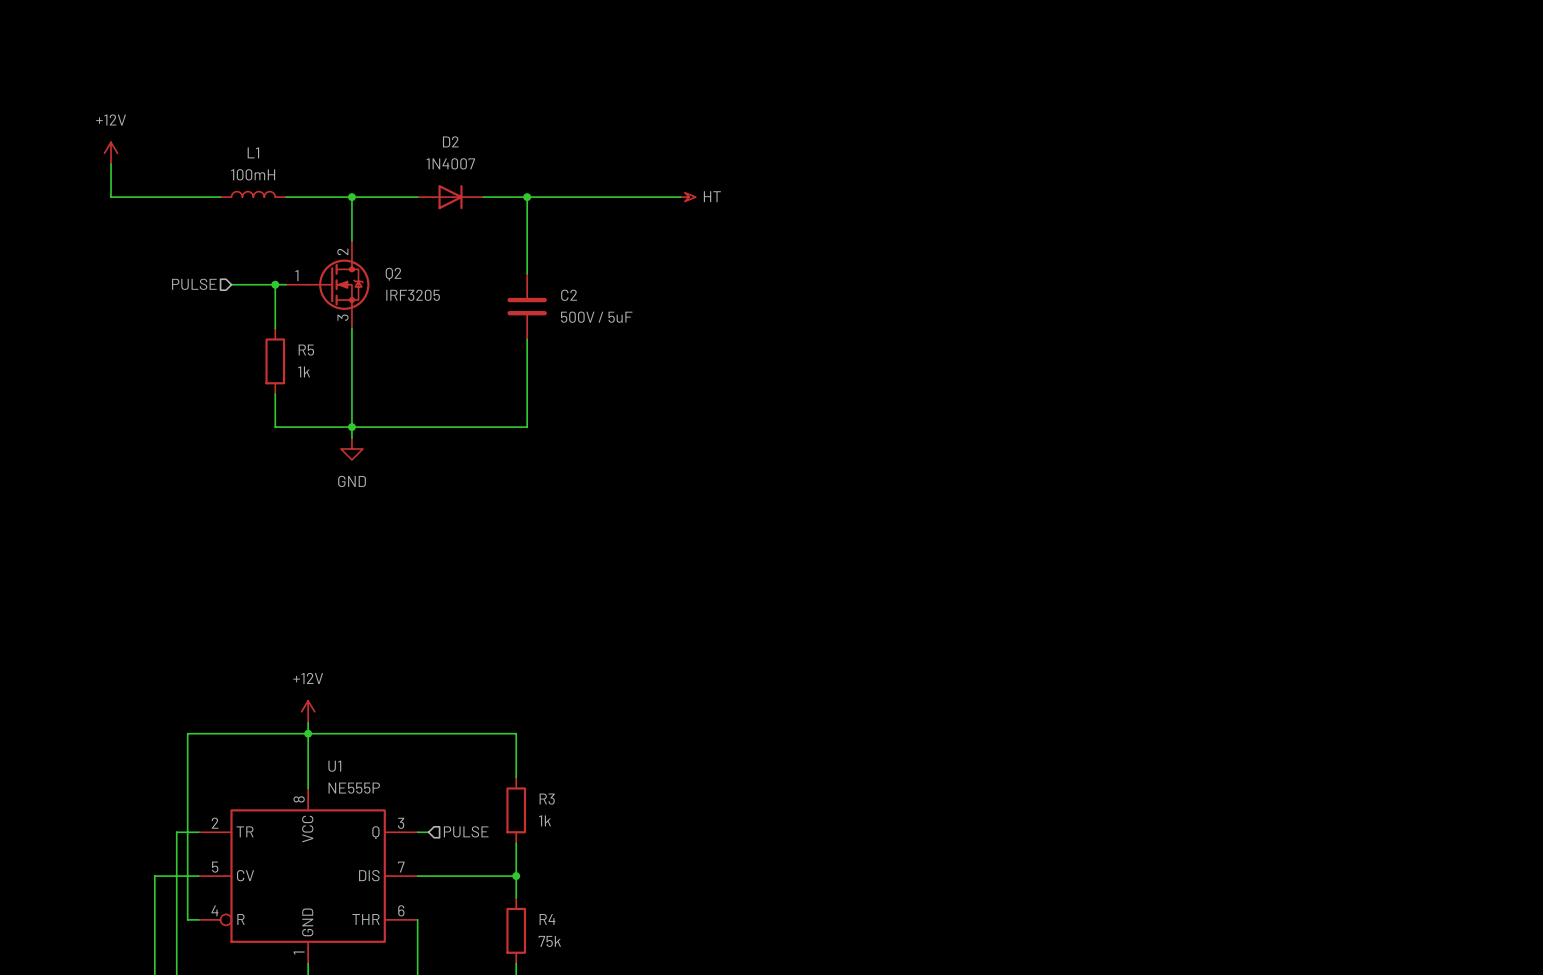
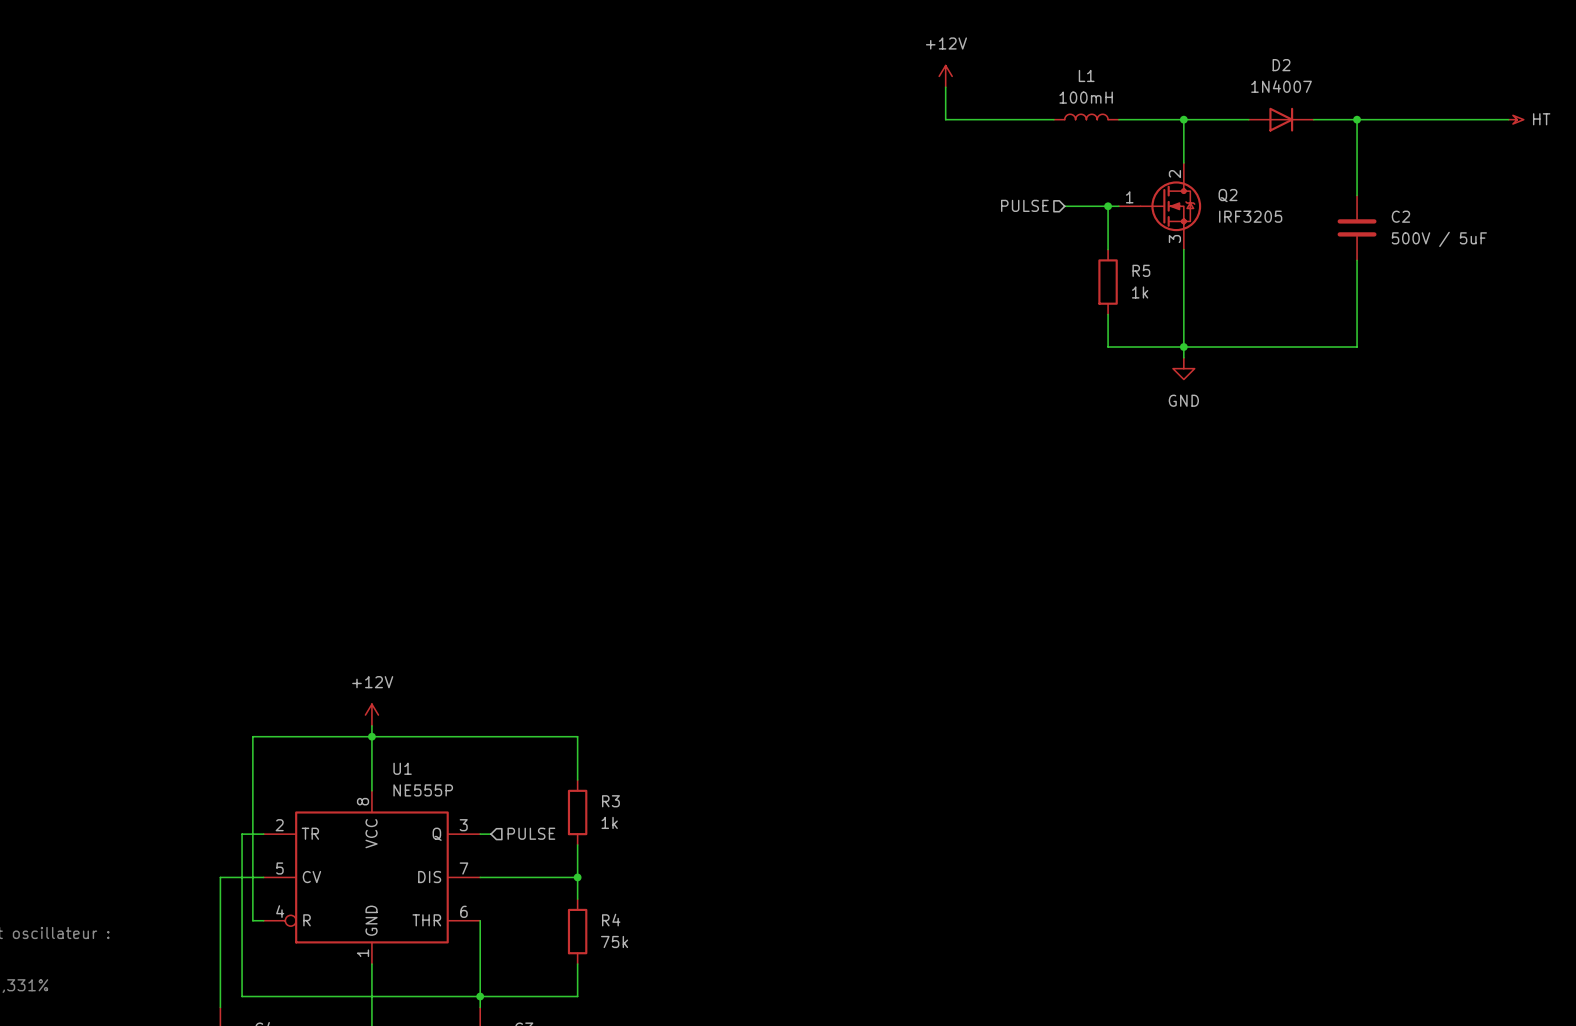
power symbol: none -> +12V (945, 76)
wire: none -> (945, 87) (945, 119) (1053, 119)
wire: none -> (1118, 119) (1248, 119)
wire: none -> (1183, 119) (1183, 162)
junction: none -> (1183, 119)
wire: none -> (1313, 119) (1508, 119)
wire: none -> (1357, 119) (1357, 195)
junction: none -> (1357, 119)
power symbol: none -> HT (1516, 119)
power symbol: +12V (111, 153) -> none
wire: (111, 164) (111, 197) (220, 197) -> none
L1 position: (253, 194) -> (1086, 116)
hierarchical label: none -> PULSE (1024, 205)
wire: (286, 197) (417, 197) -> none
wire: (351, 197) (351, 240) -> none
junction: (351, 197) -> none
D2 position: (450, 197) -> (1281, 119)
wire: (483, 197) (680, 197) -> none
wire: (527, 197) (527, 273) -> none
junction: (527, 197) -> none
power symbol: HT (688, 197) -> none
wire: none -> (1064, 206) (1118, 206)
wire: none -> (1108, 206) (1108, 249)
junction: none -> (1108, 206)
wire: none -> (1183, 249) (1183, 357)
wire: none -> (1357, 260) (1357, 347) (1108, 347) (1108, 314)
hierarchical label: PULSE (194, 284) -> none
wire: (231, 284) (286, 284) -> none
wire: (275, 284) (275, 328) -> none
junction: (275, 284) -> none
Q2 position: (327, 284) -> (1160, 206)
C2 position: (527, 306) -> (1357, 227)
wire: (351, 328) (351, 438) -> none
wire: (527, 339) (527, 427) (275, 427) (275, 394) -> none
junction: none -> (1183, 347)
R5 position: (275, 361) -> (1108, 282)
power symbol: none -> GND (1183, 368)
junction: (351, 427) -> none
power symbol: GND (351, 448) -> none

